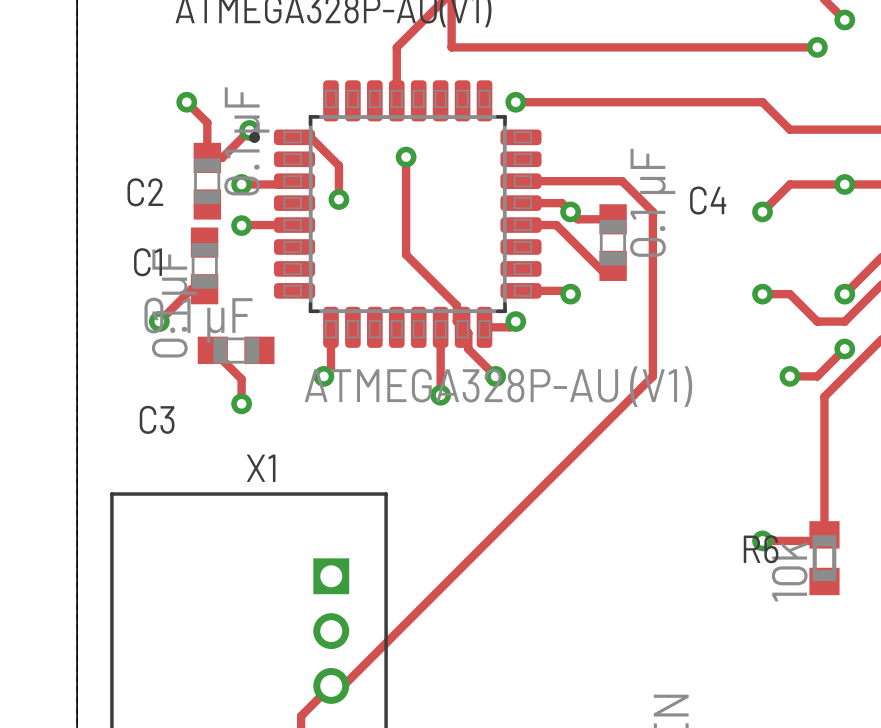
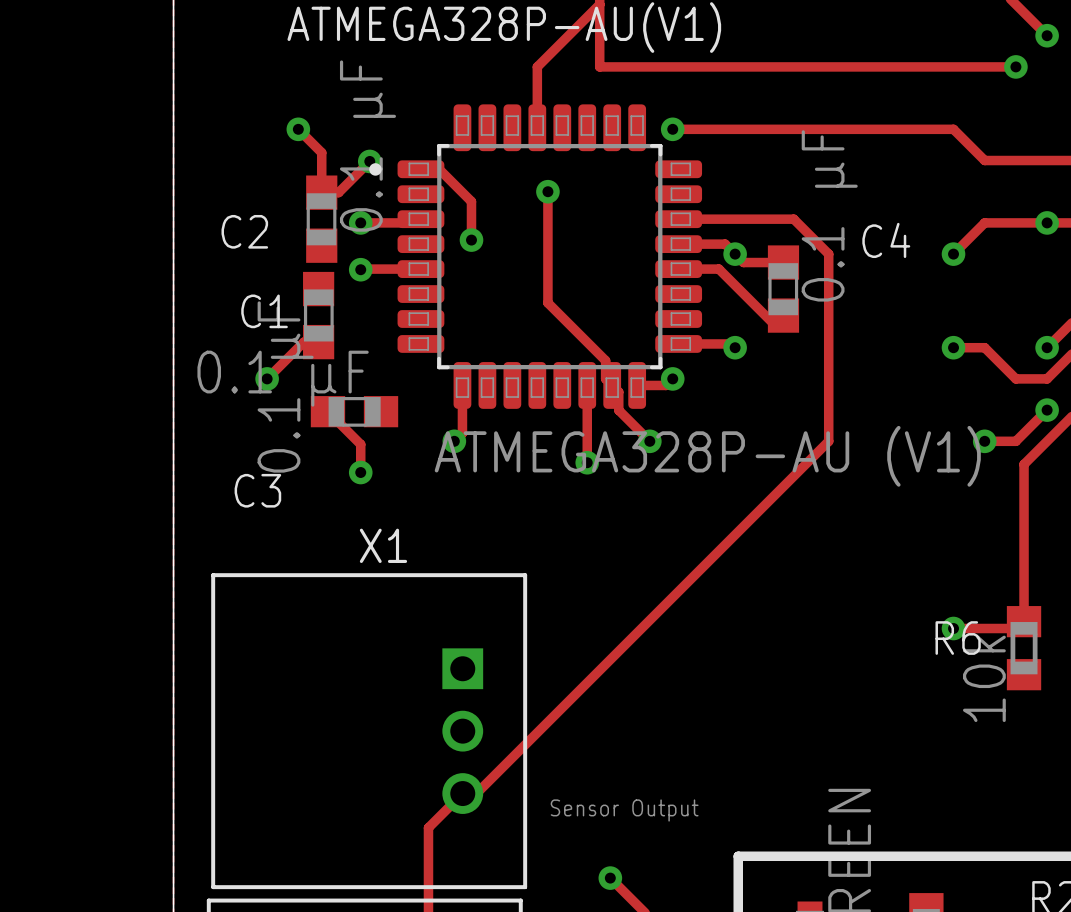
text: none -> Sensor Output (624, 810)

